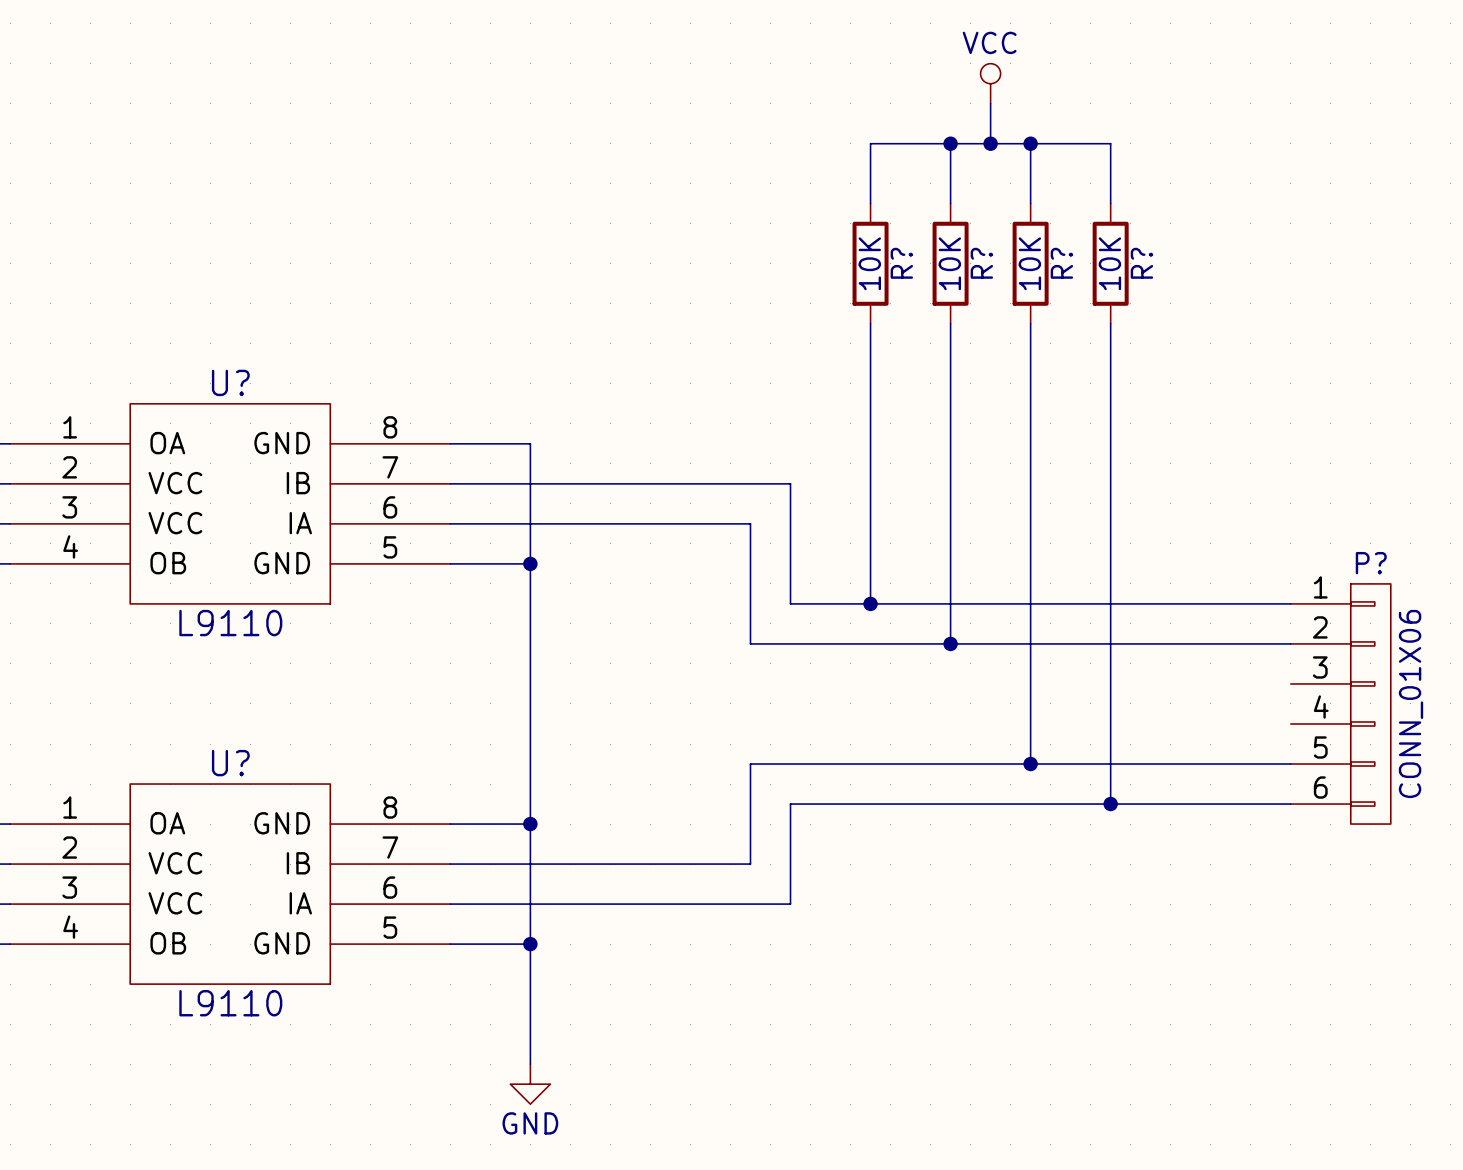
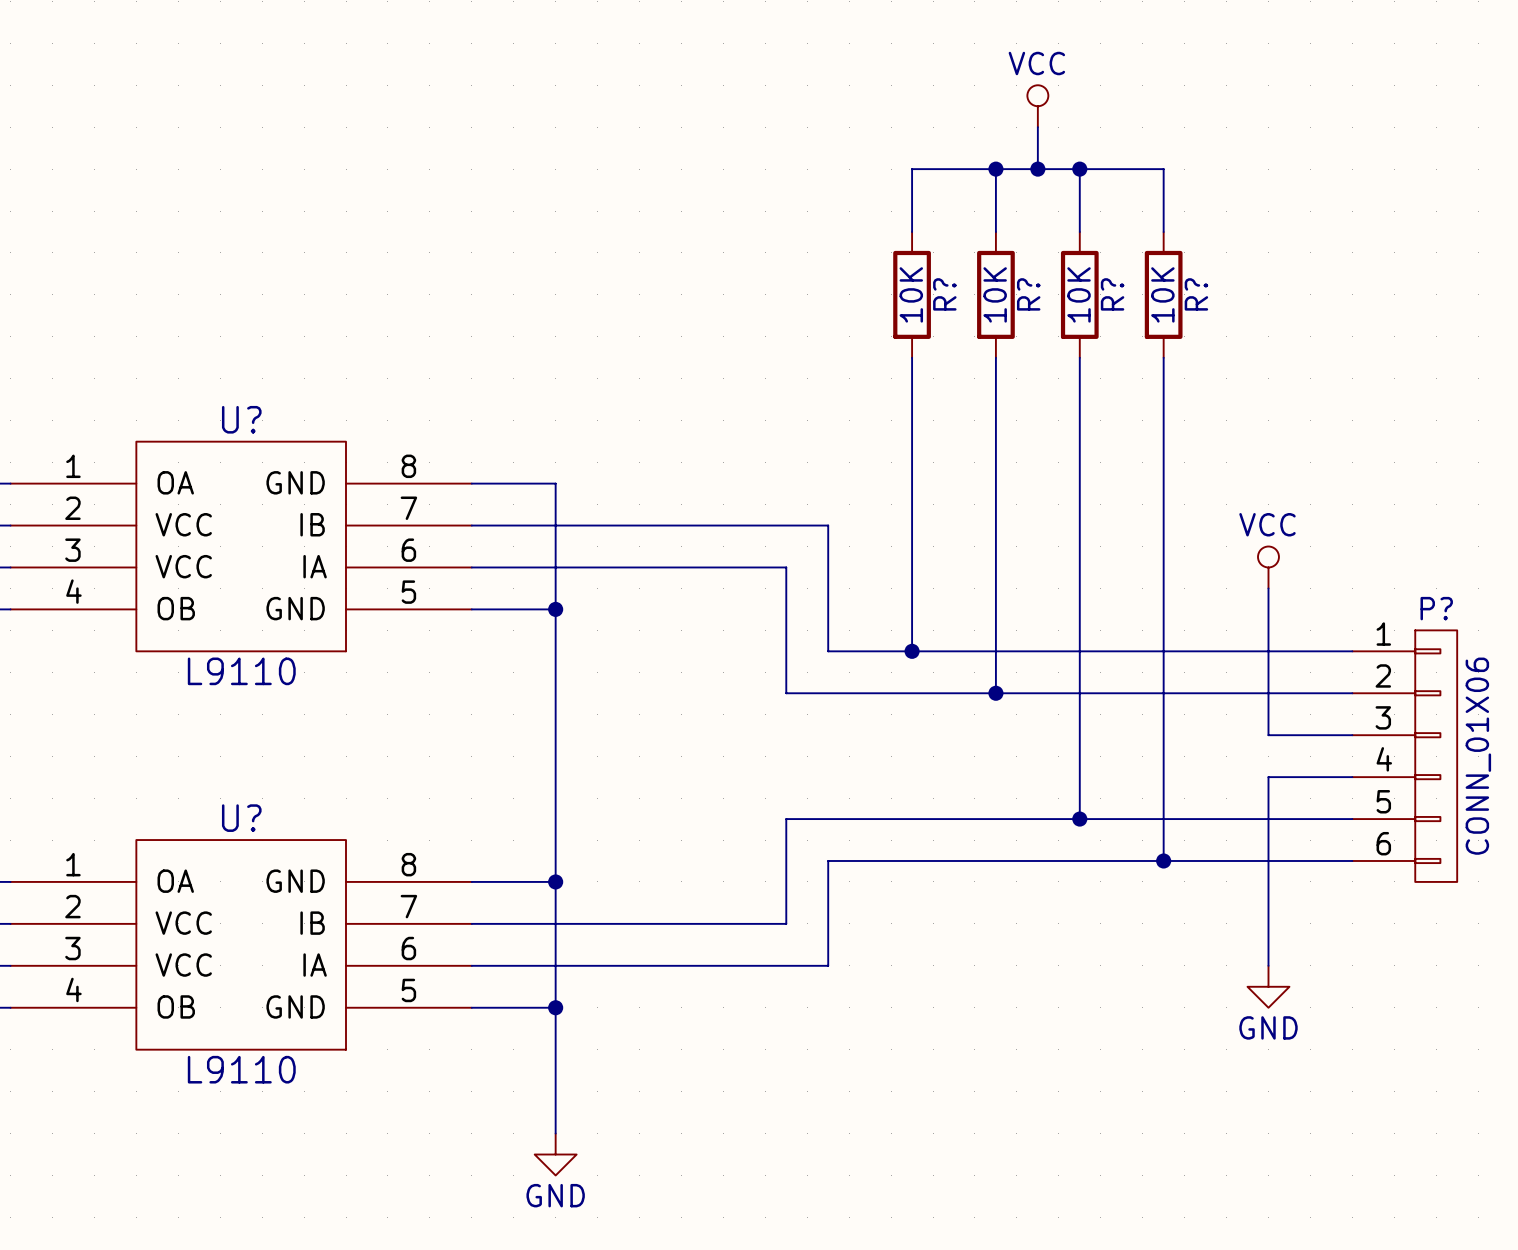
power symbol: none -> VCC (1268, 567)
wire: none -> (1268, 588) (1268, 735) (1352, 735)
wire: none -> (1352, 777) (1268, 777) (1268, 965)
power symbol: none -> GND (1268, 986)

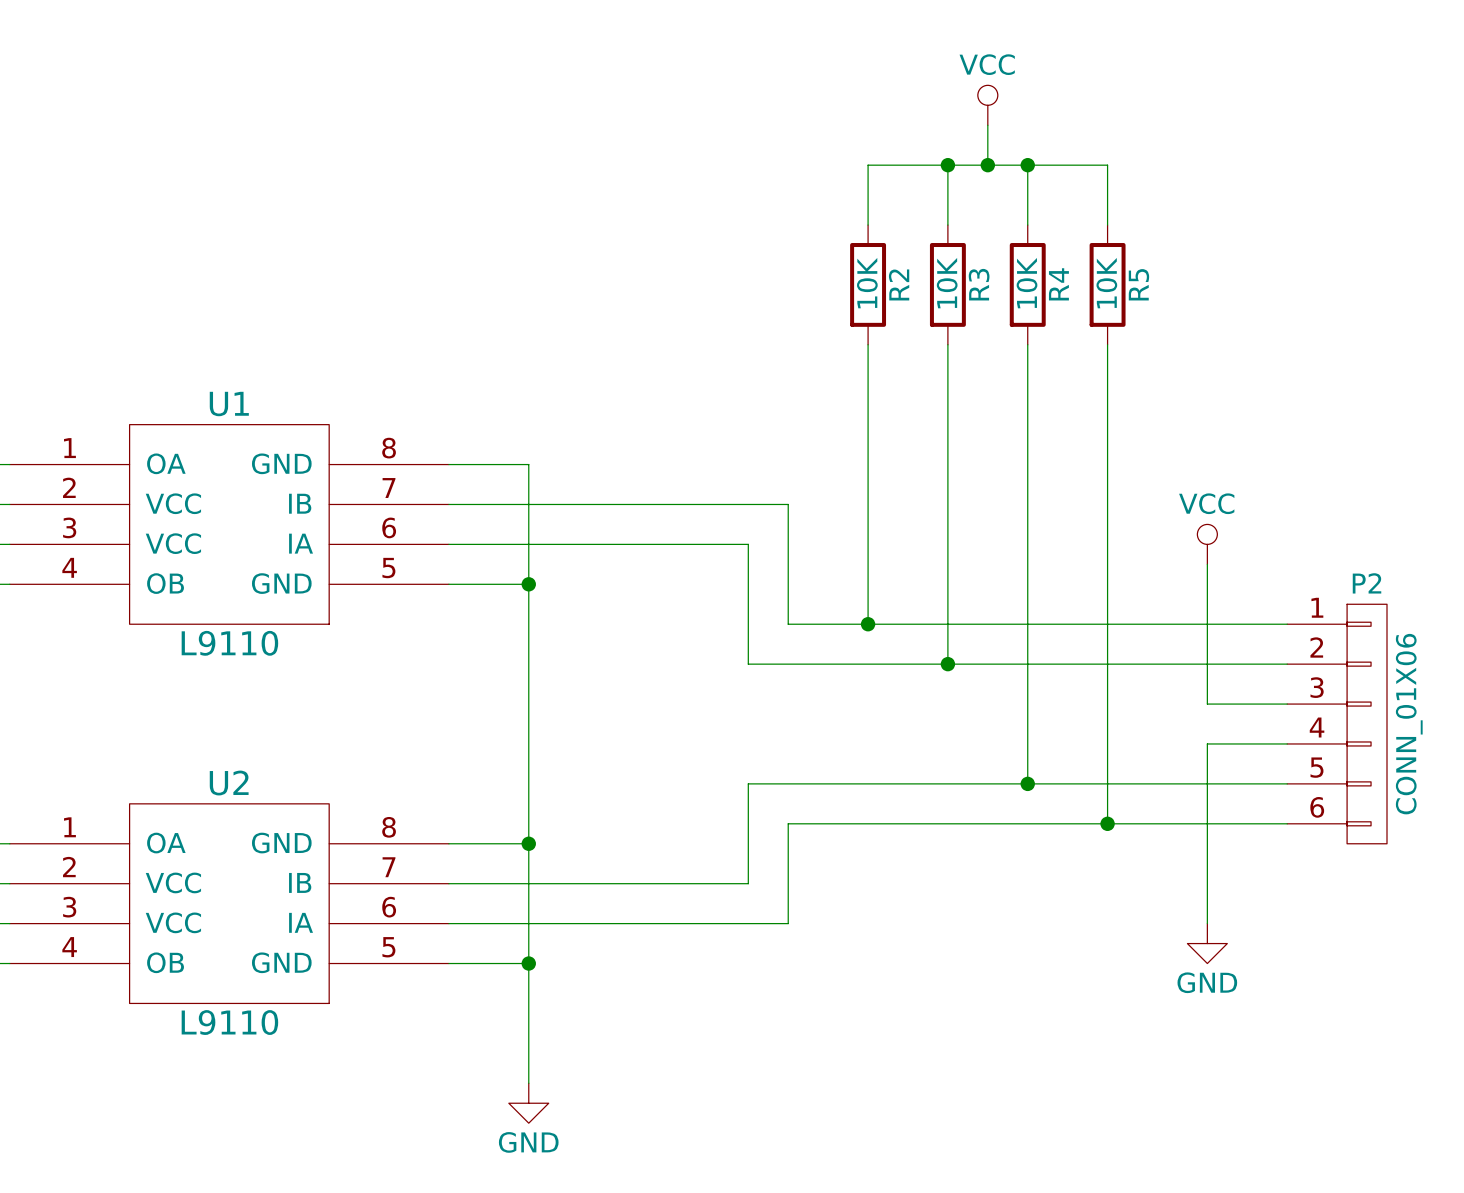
R? name: R? (944, 294) -> R2 (899, 284)
R? name: R? (1028, 294) -> R3 (979, 284)
R? name: R? (1112, 294) -> R4 (1058, 284)
R? name: R? (1196, 294) -> R5 (1138, 284)
U? name: U? (241, 419) -> U1 (229, 404)
P? name: P? (1436, 608) -> P2 (1367, 583)
U? name: U? (241, 818) -> U2 (229, 783)

